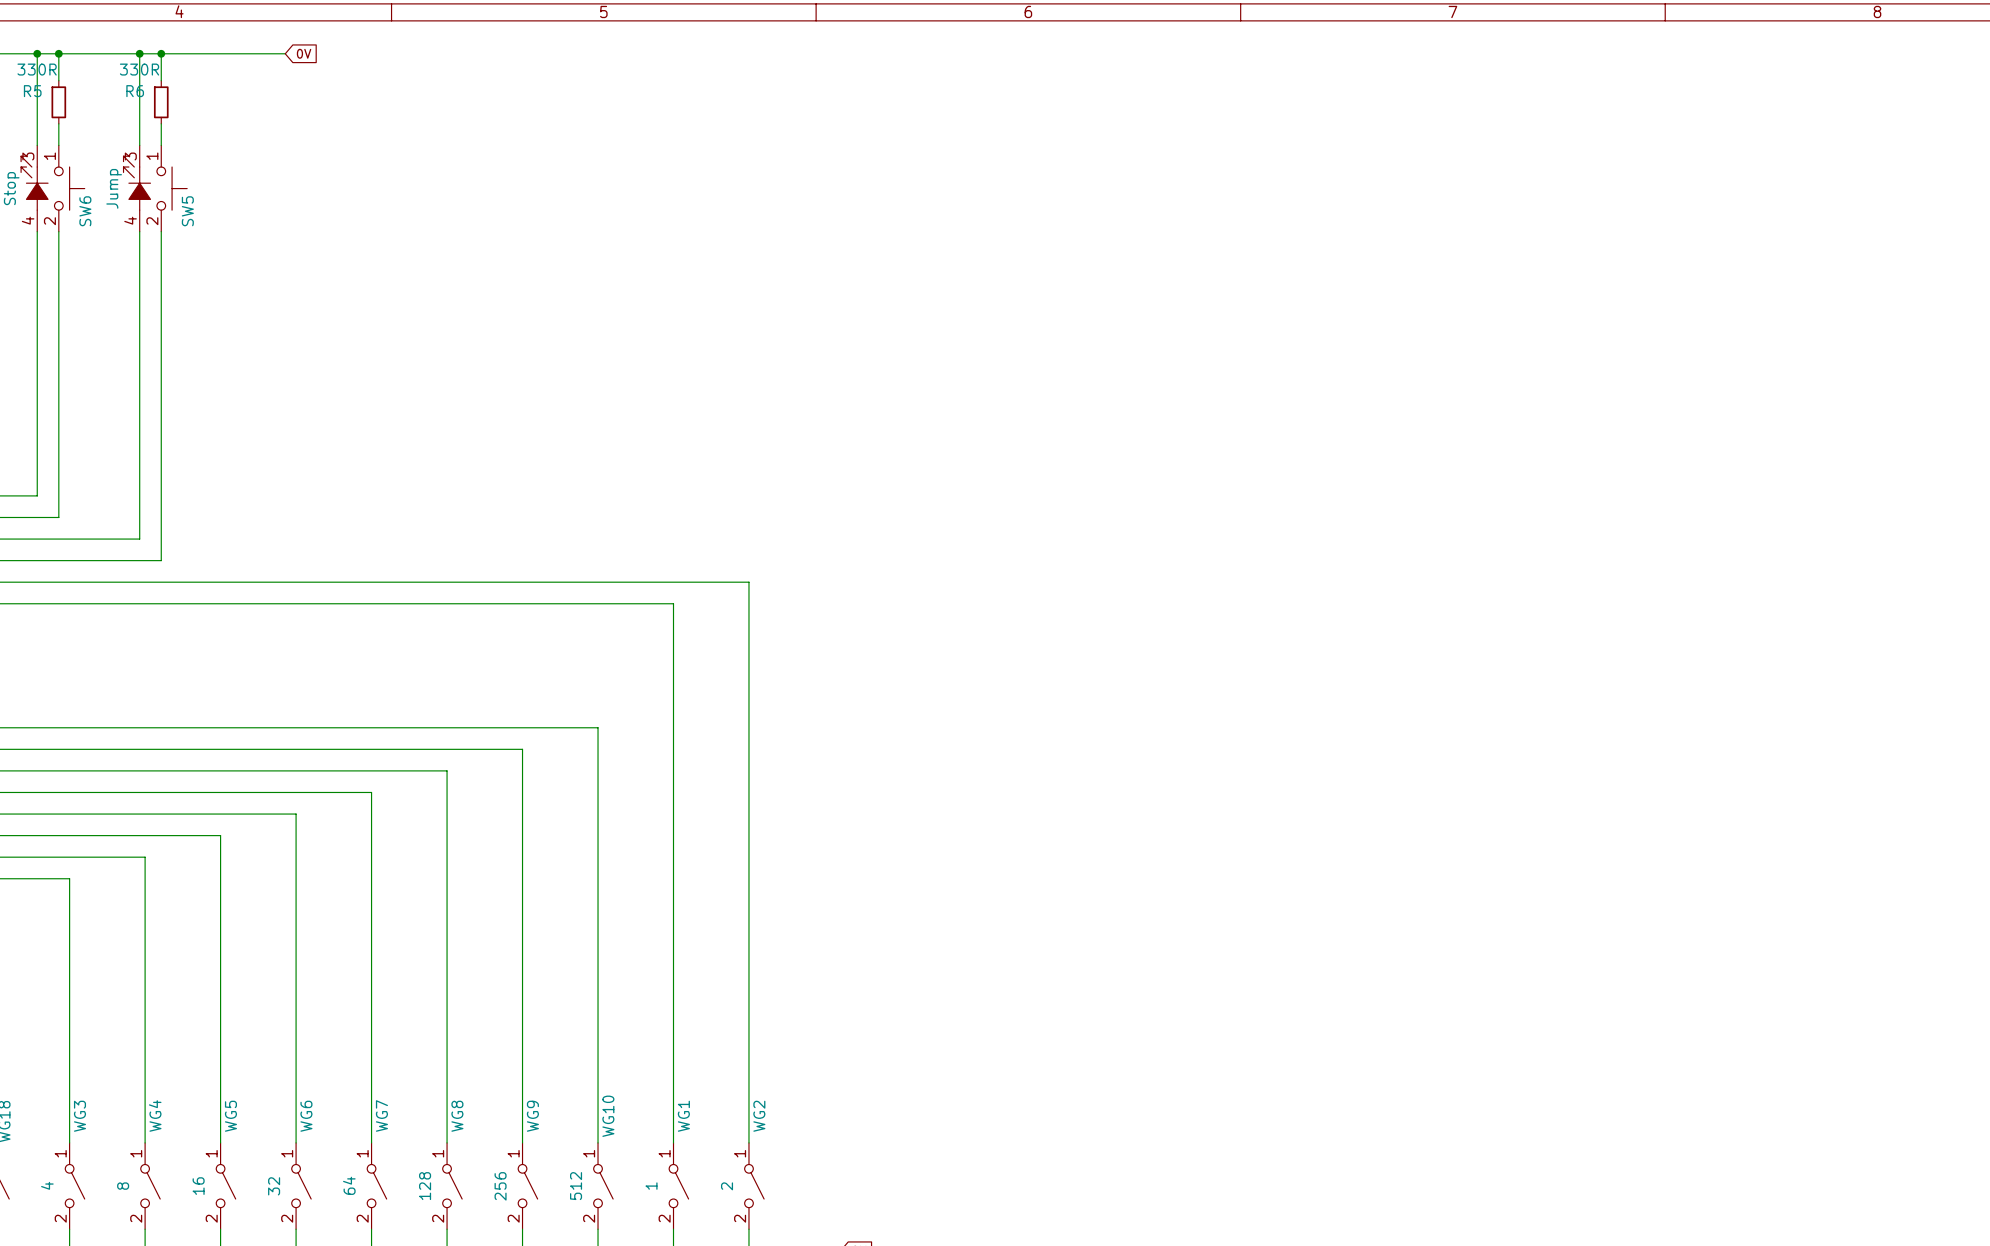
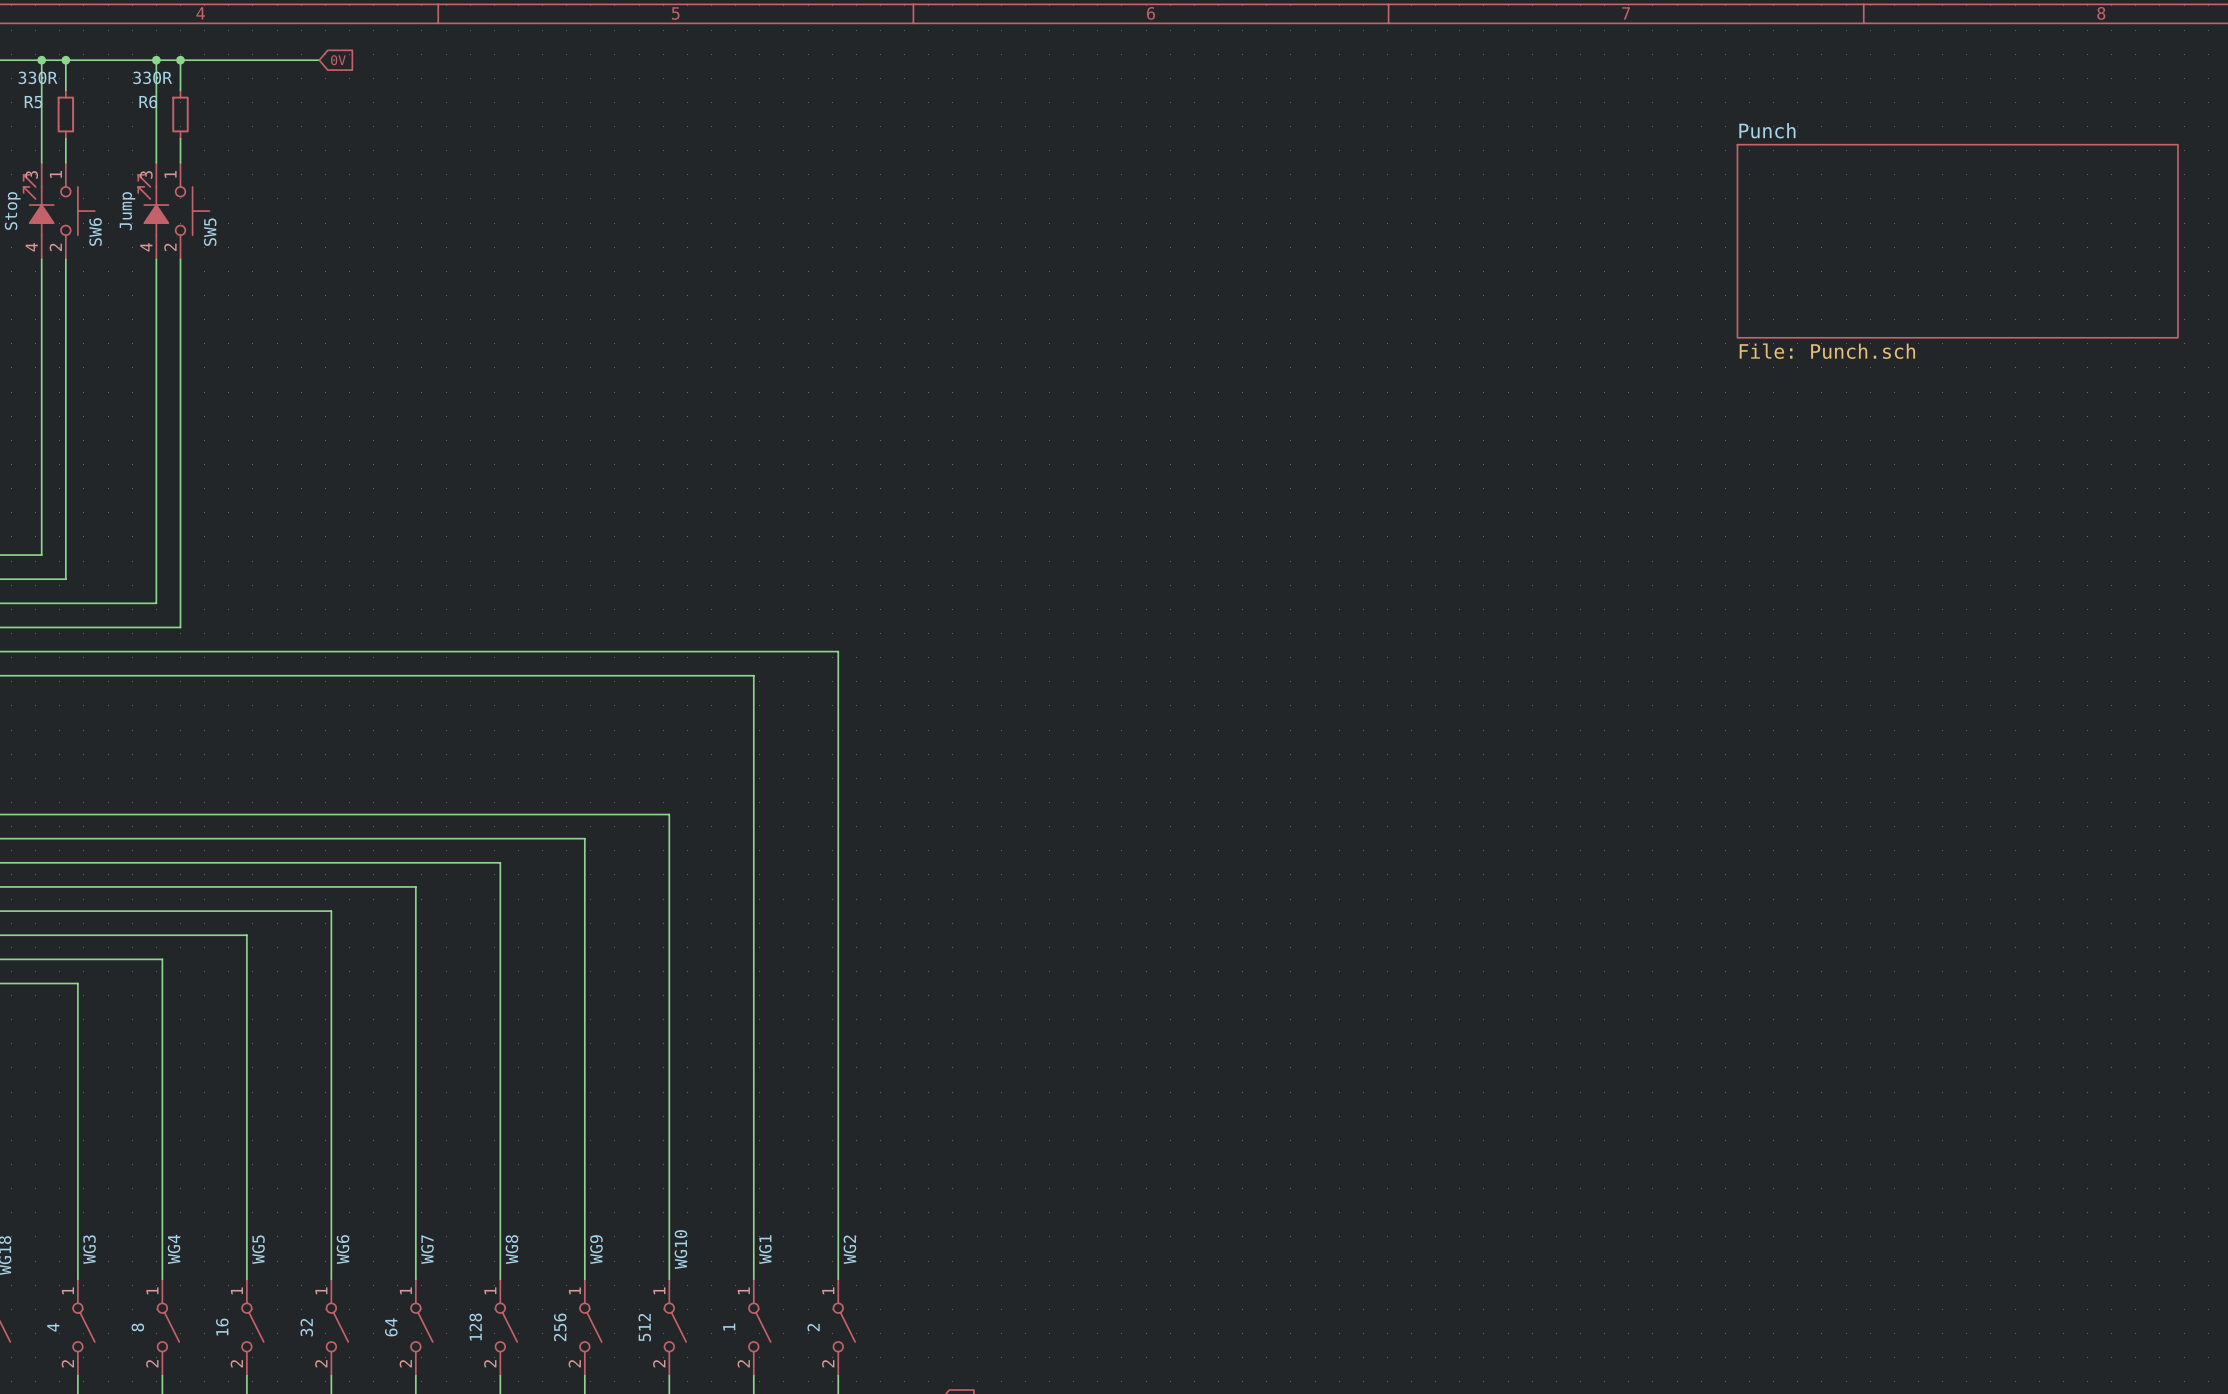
sheet Punch: none -> File: Punch.sch (1957, 241)

